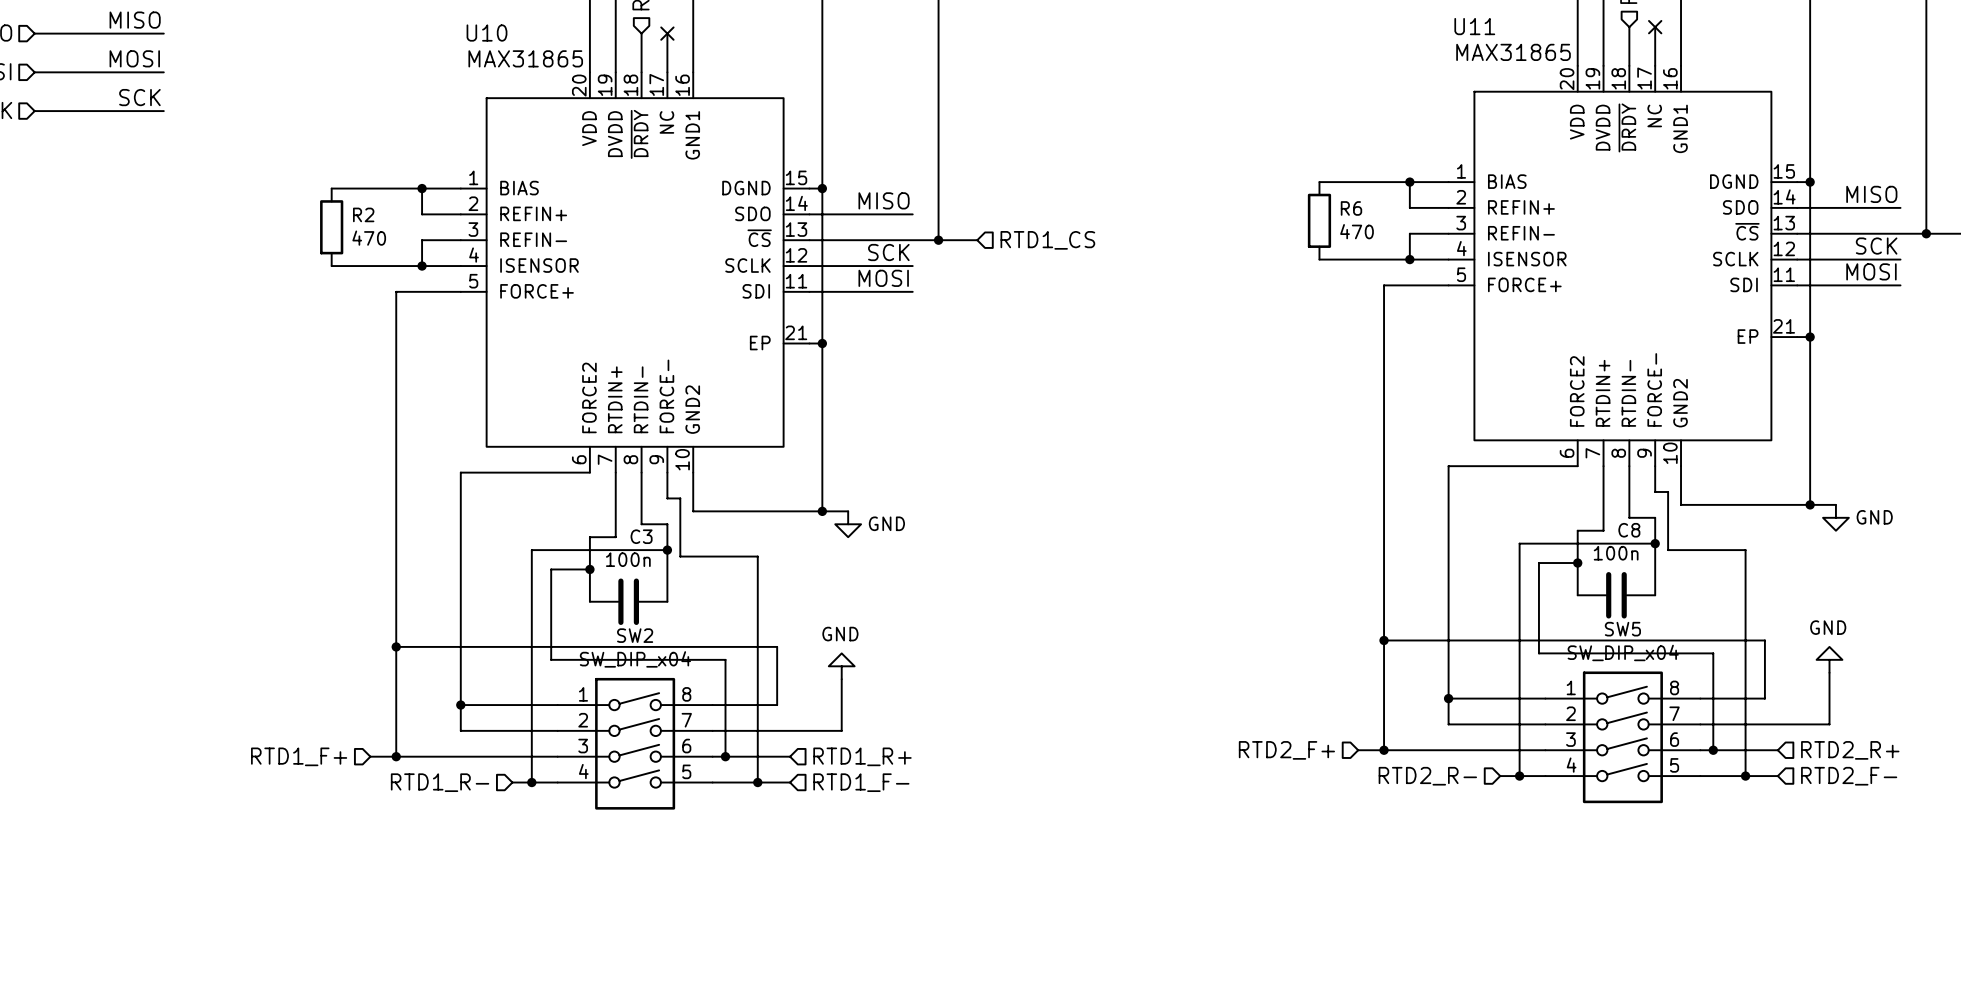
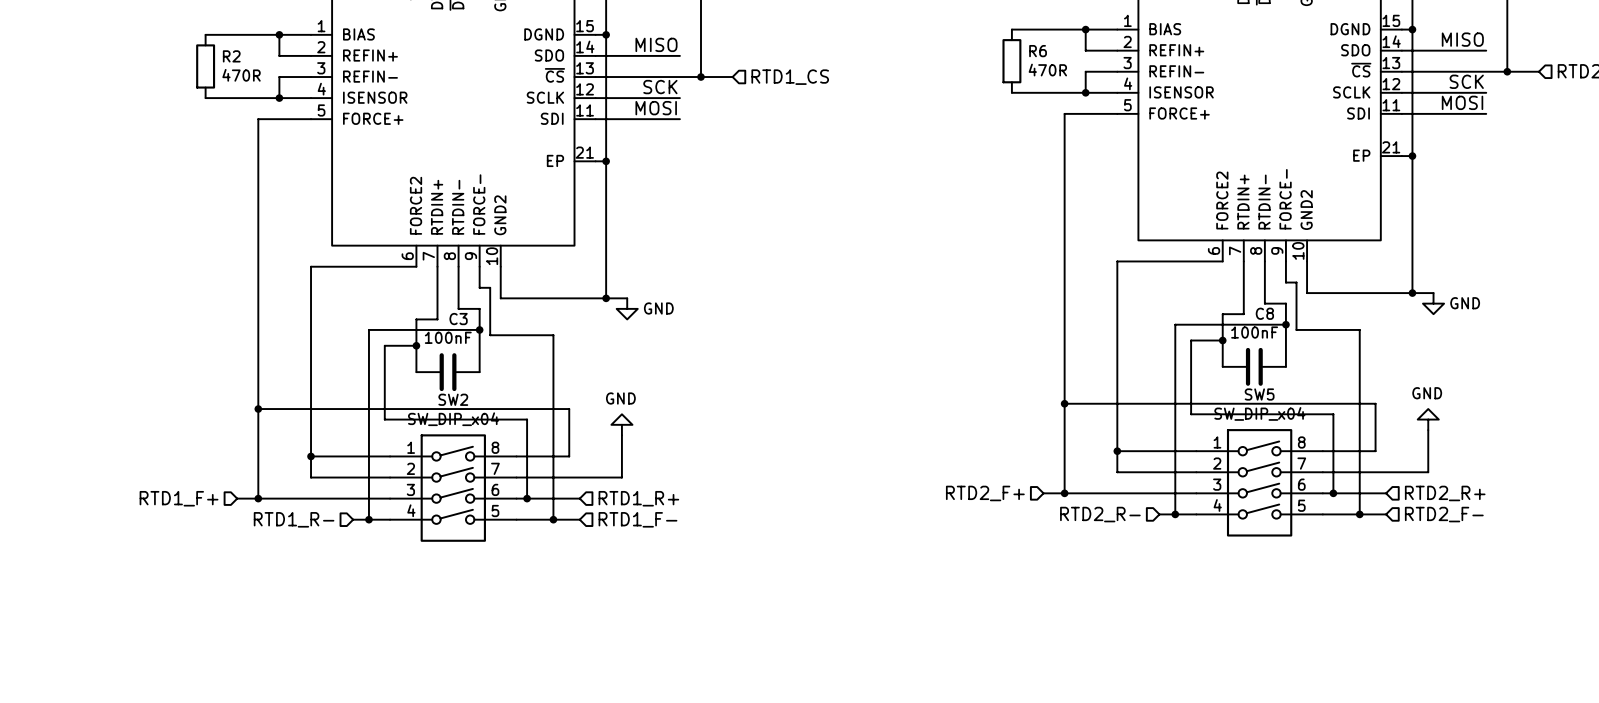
R6 value: 470 (1357, 231) -> 470R (1047, 70)
R2 value: 470 (369, 238) -> 470R (241, 75)
C8 value: 100n (1616, 553) -> 100nF (1254, 332)
C3 value: 100n (628, 559) -> 100nF (448, 337)

